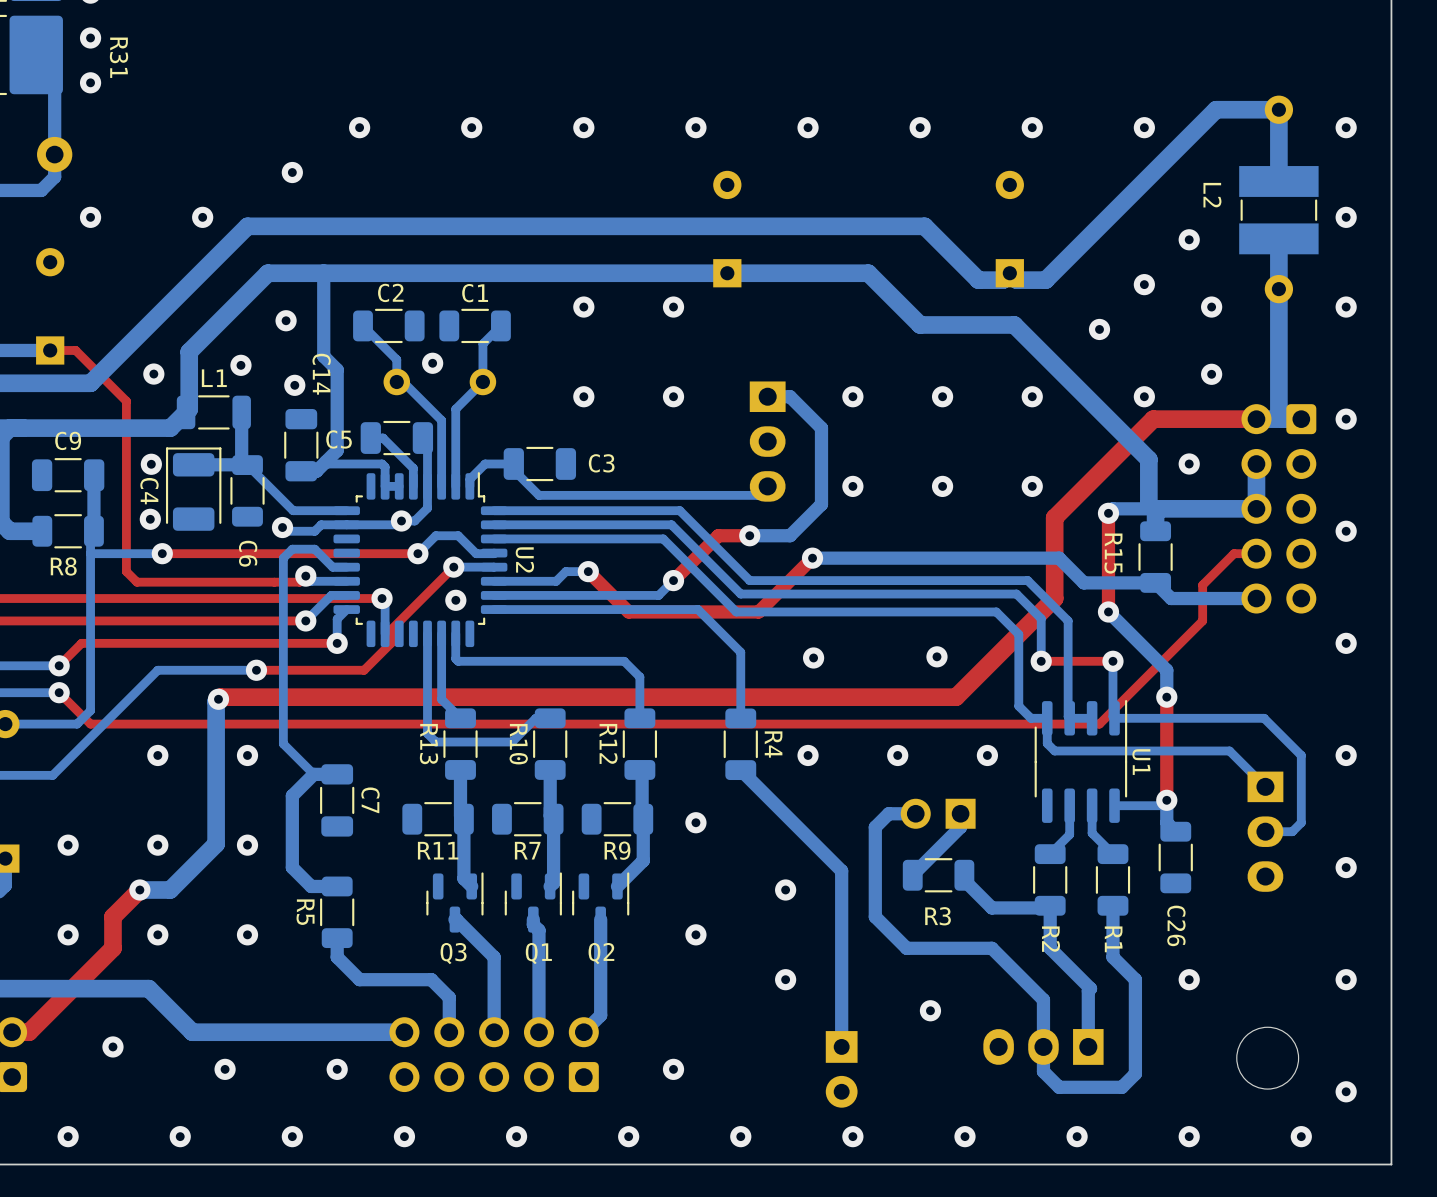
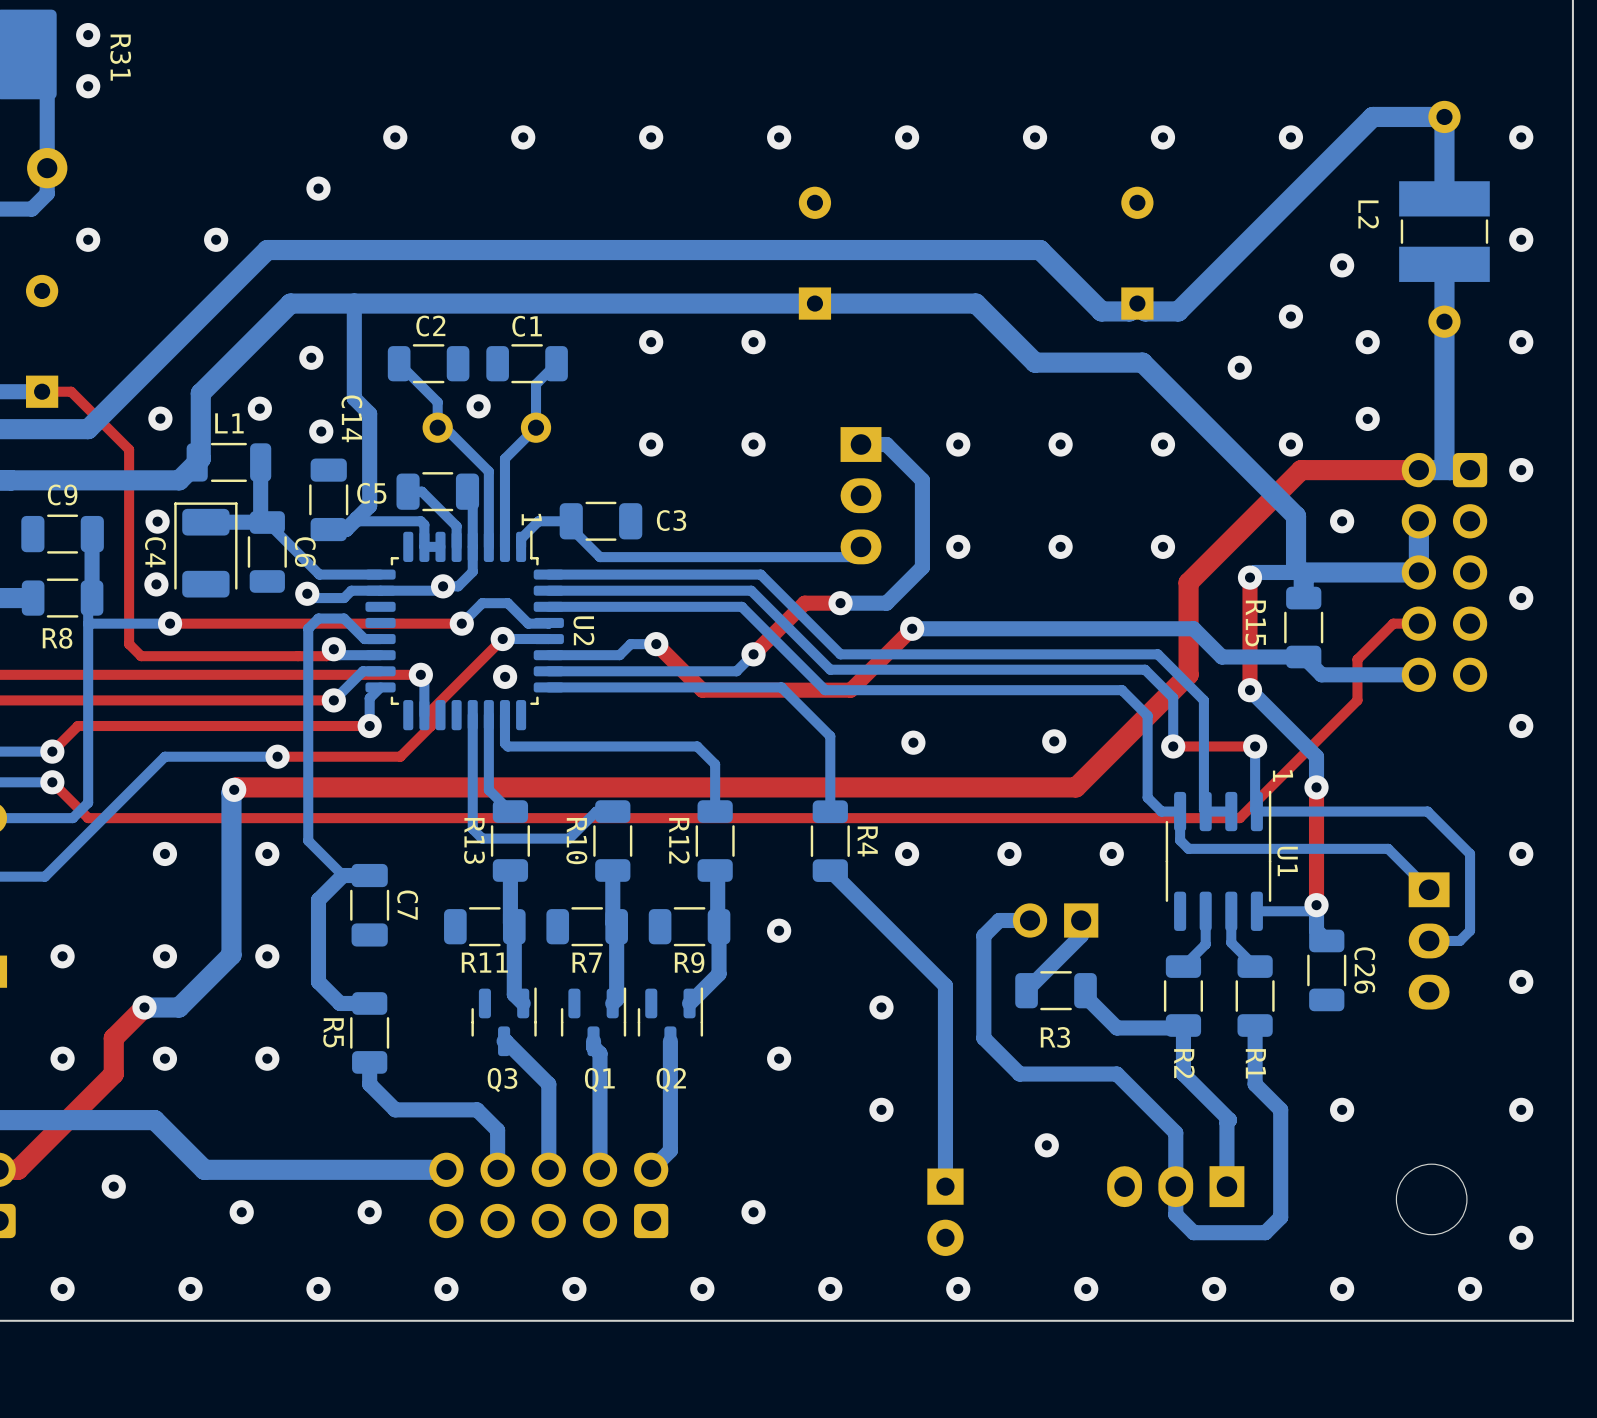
text: none -> 1 (531, 519)
C6 name position: C6 (248, 553) -> C6 (305, 552)
text: none -> 1 (1283, 776)
C26 name position: C26 (1176, 925) -> C26 (1364, 970)

